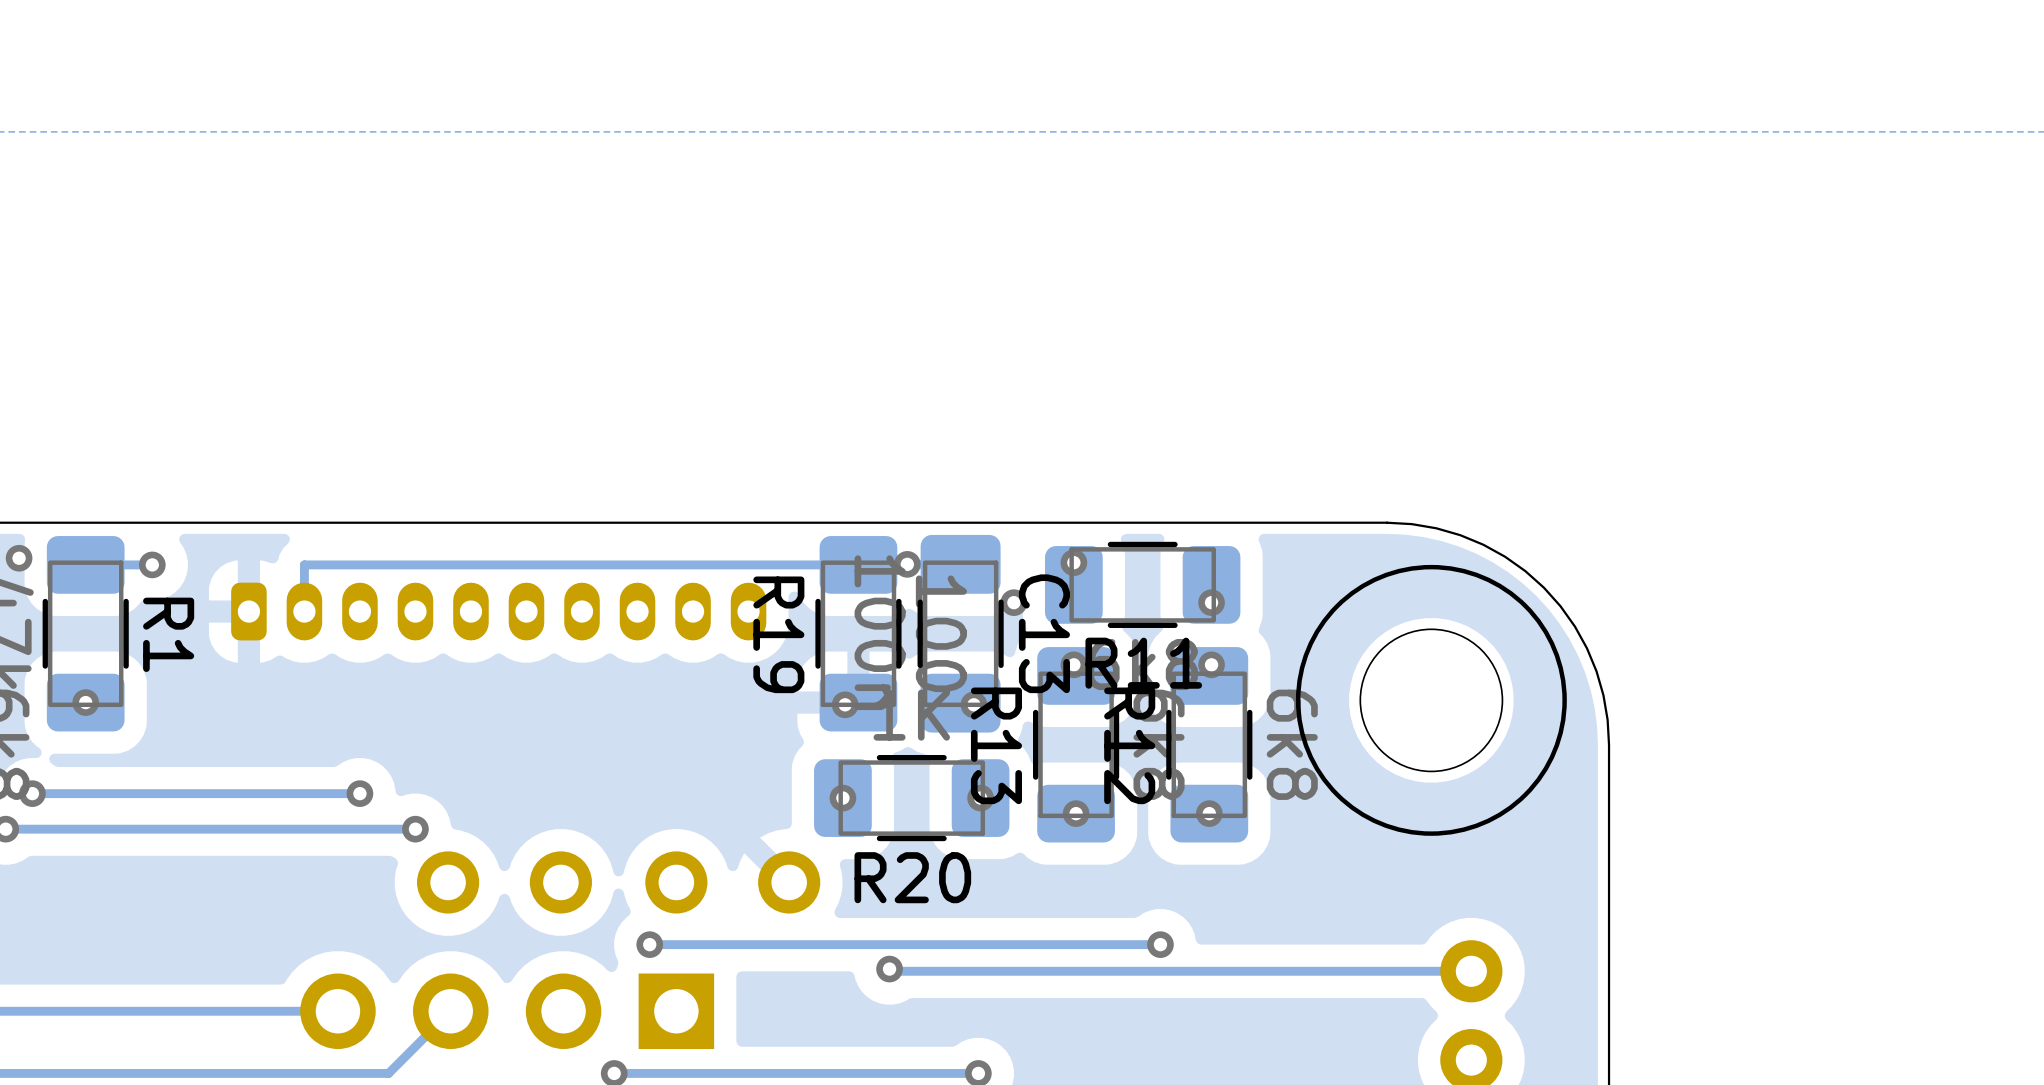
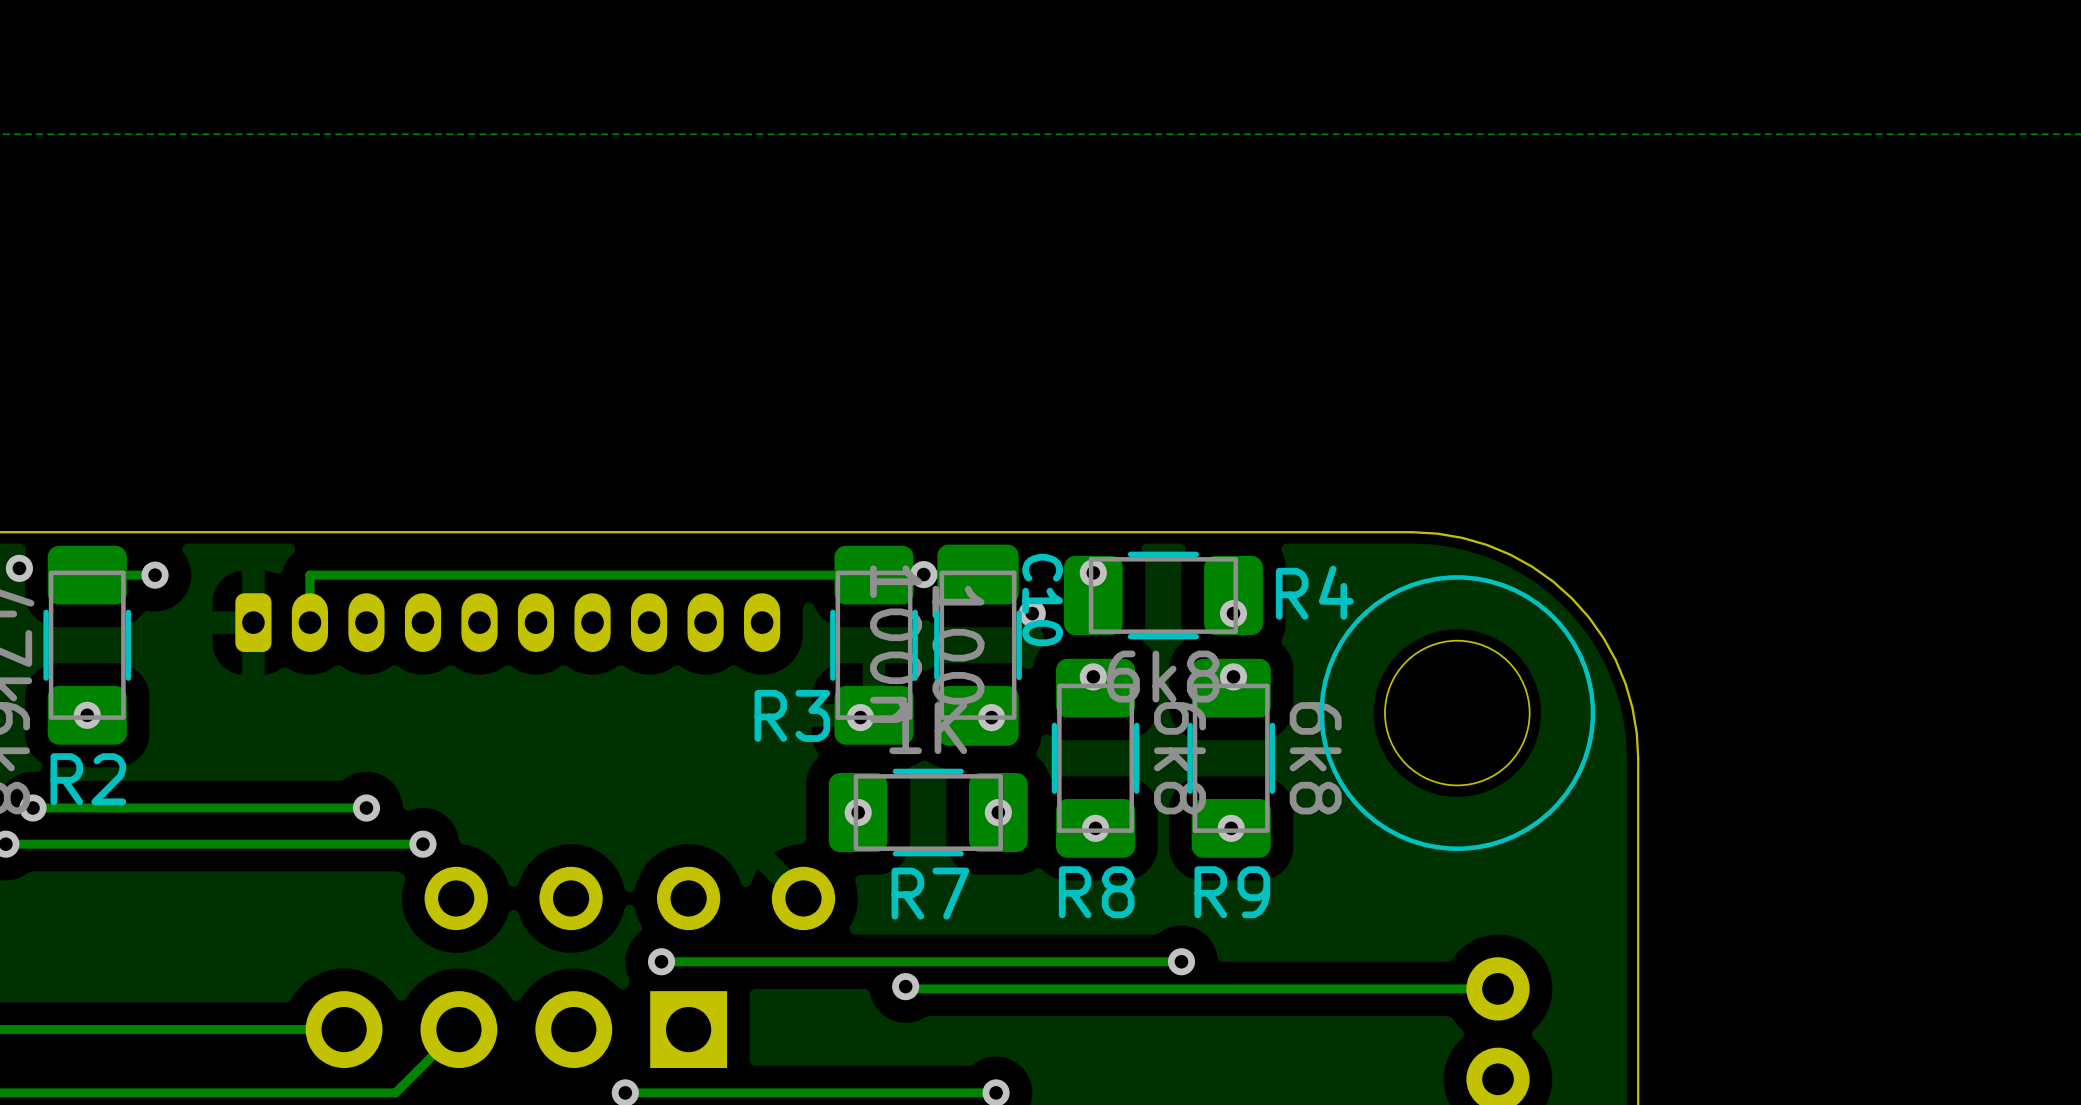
C13 name: C13 (1044, 633) -> C10 (1042, 600)
R1 name: R1 (168, 634) -> R2 (88, 779)
R19 name: R19 (778, 634) -> R3 (792, 715)
R11 name: R11 (1143, 663) -> R4 (1314, 592)
R13 name: R13 (996, 745) -> R8 (1096, 892)
R12 name: R12 (1129, 745) -> R9 (1232, 892)
R20 name: R20 (912, 877) -> R7 (930, 893)

